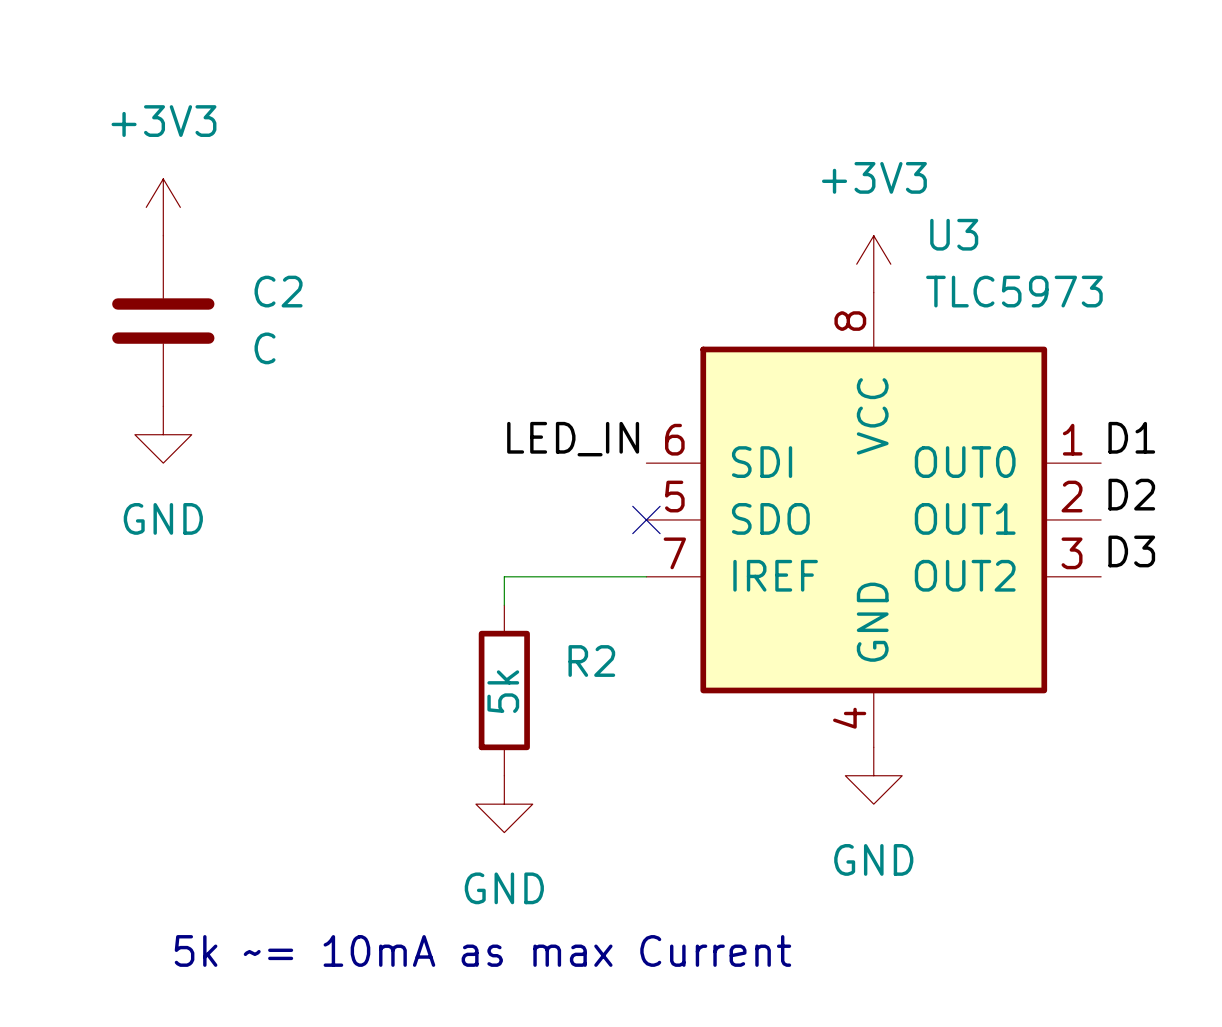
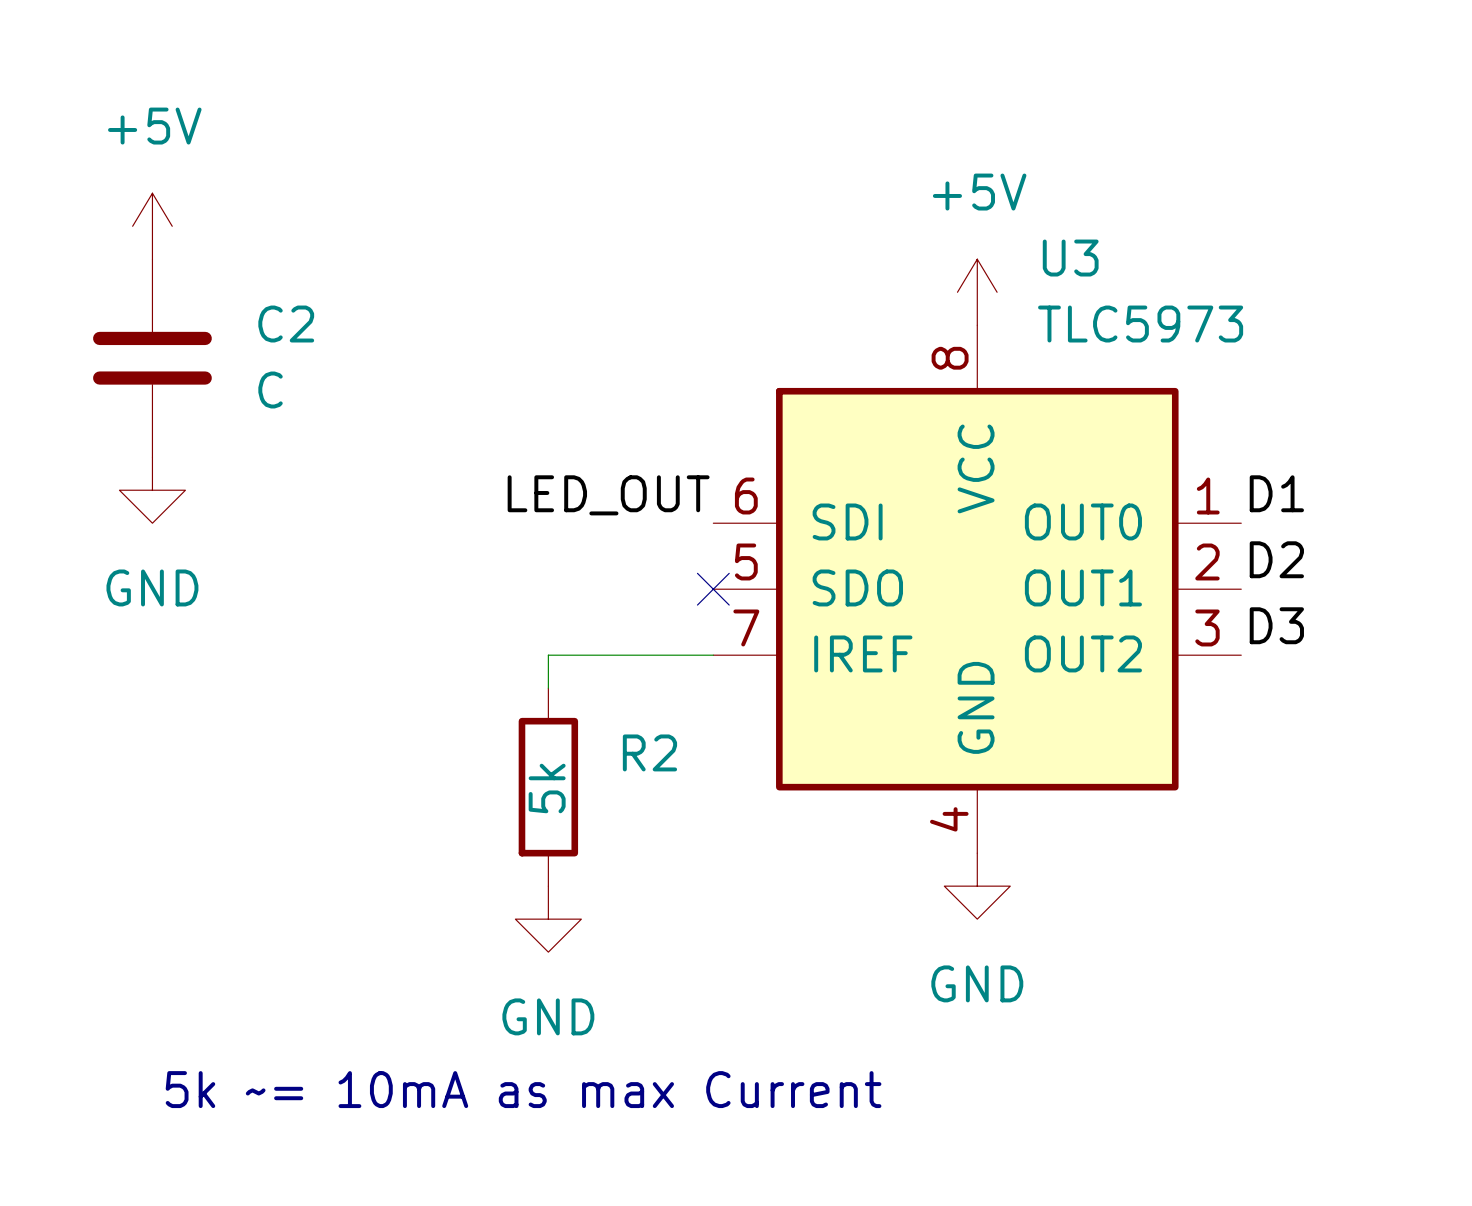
power symbol: +3V3 (163, 207) -> +5V (152, 226)
power symbol: +3V3 (873, 264) -> +5V (977, 292)
label: LED_IN (573, 439) -> LED_OUT (608, 495)

